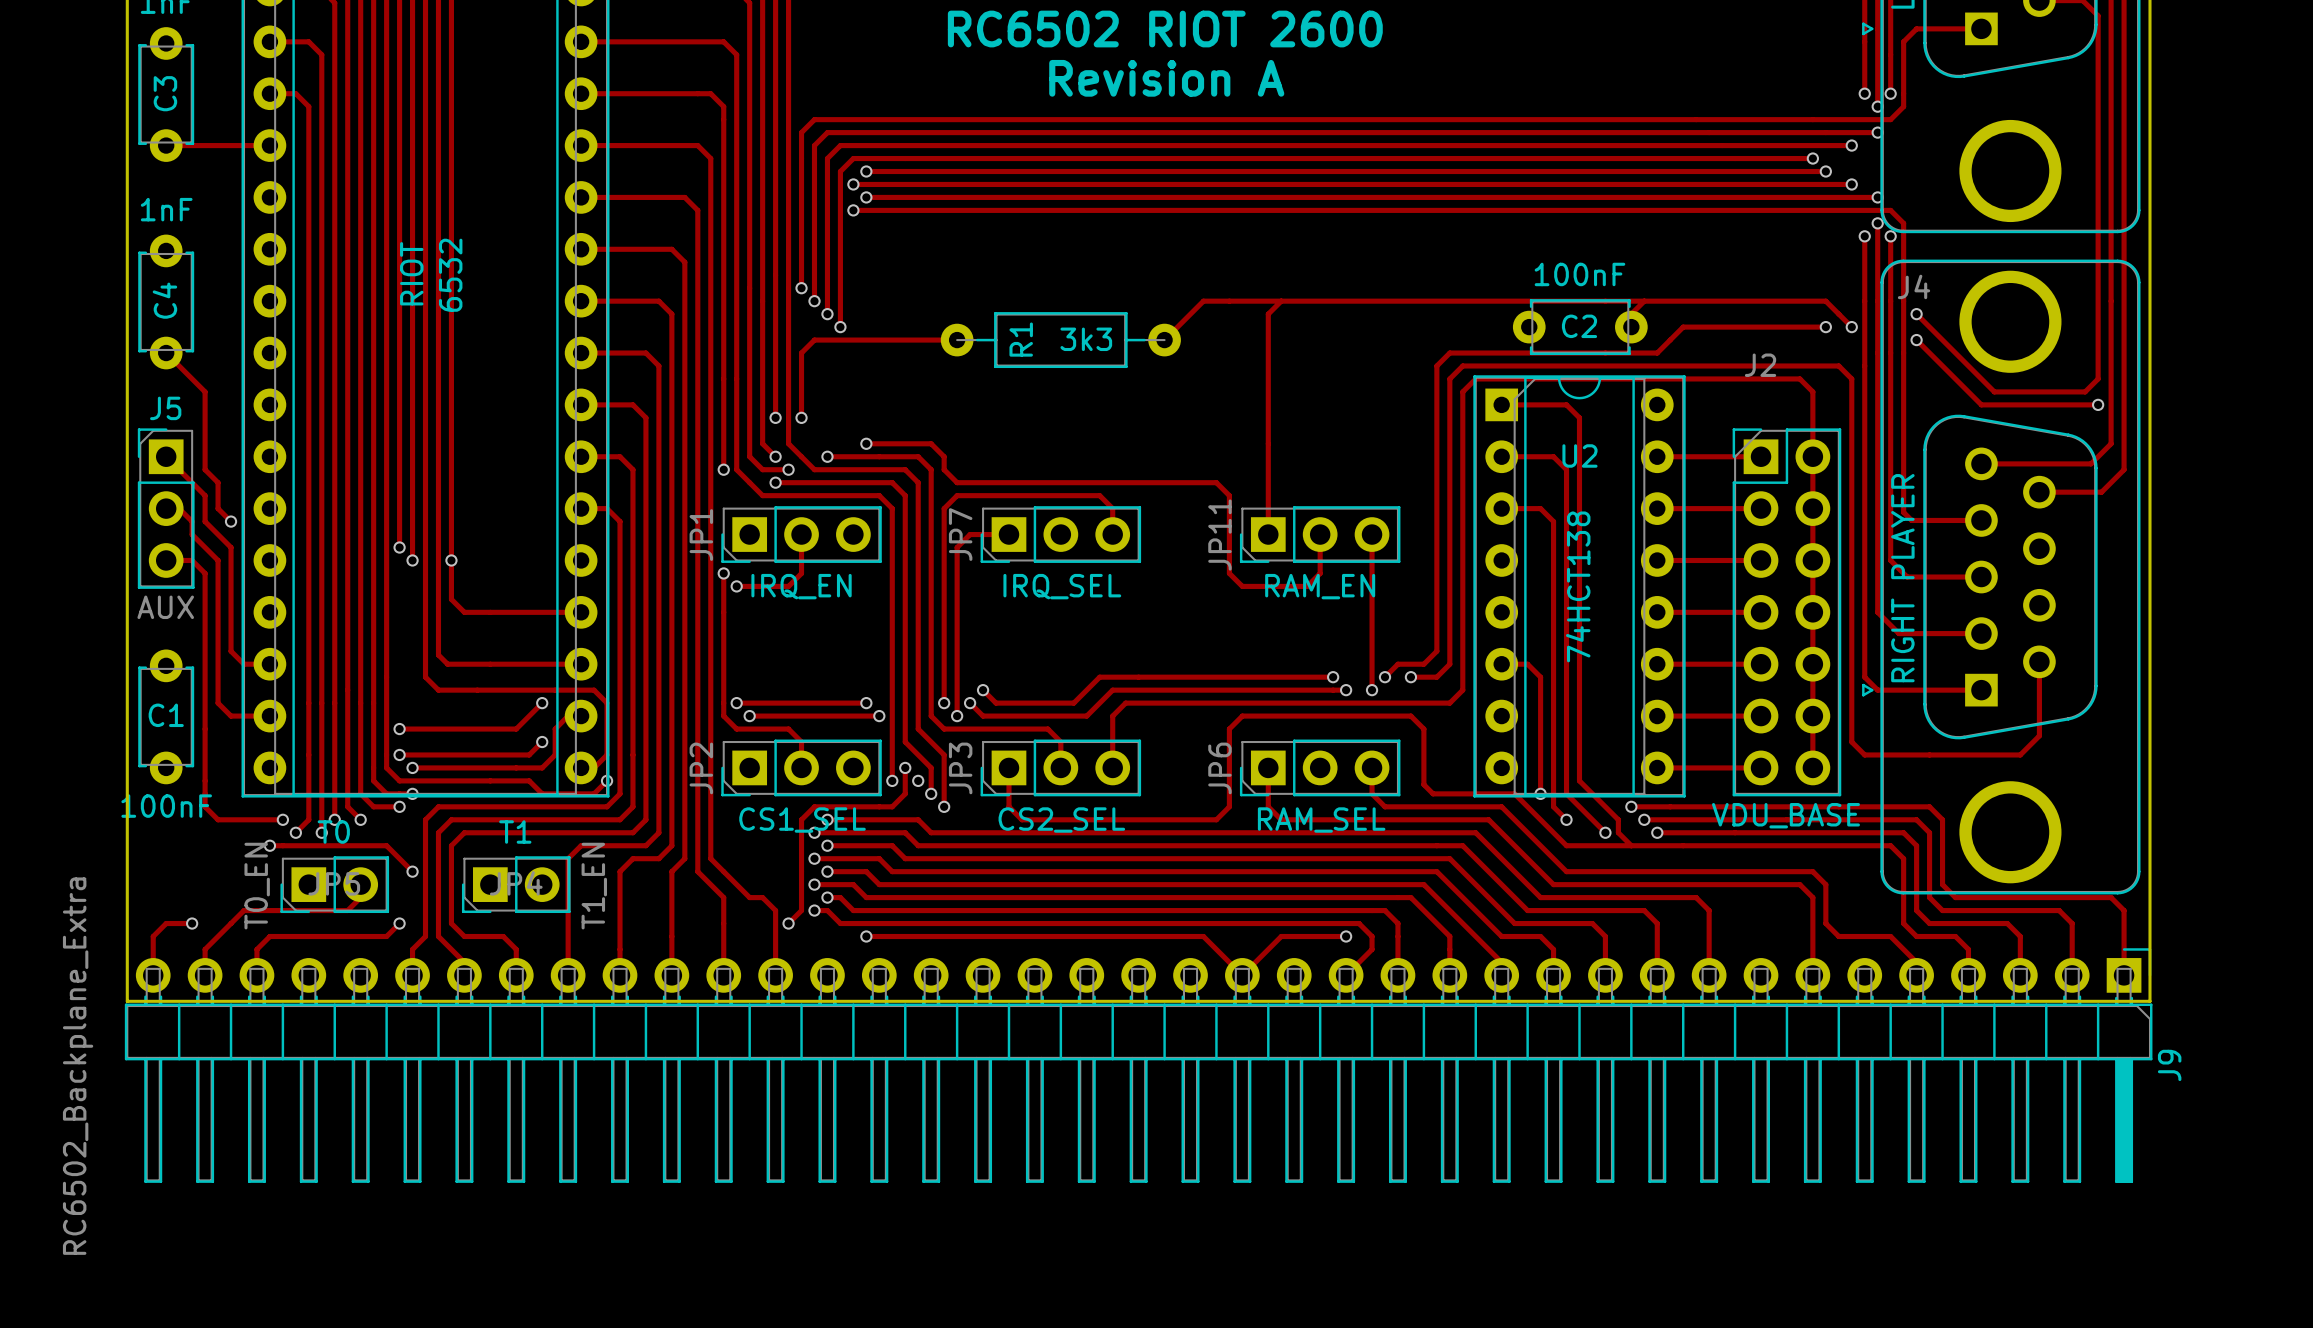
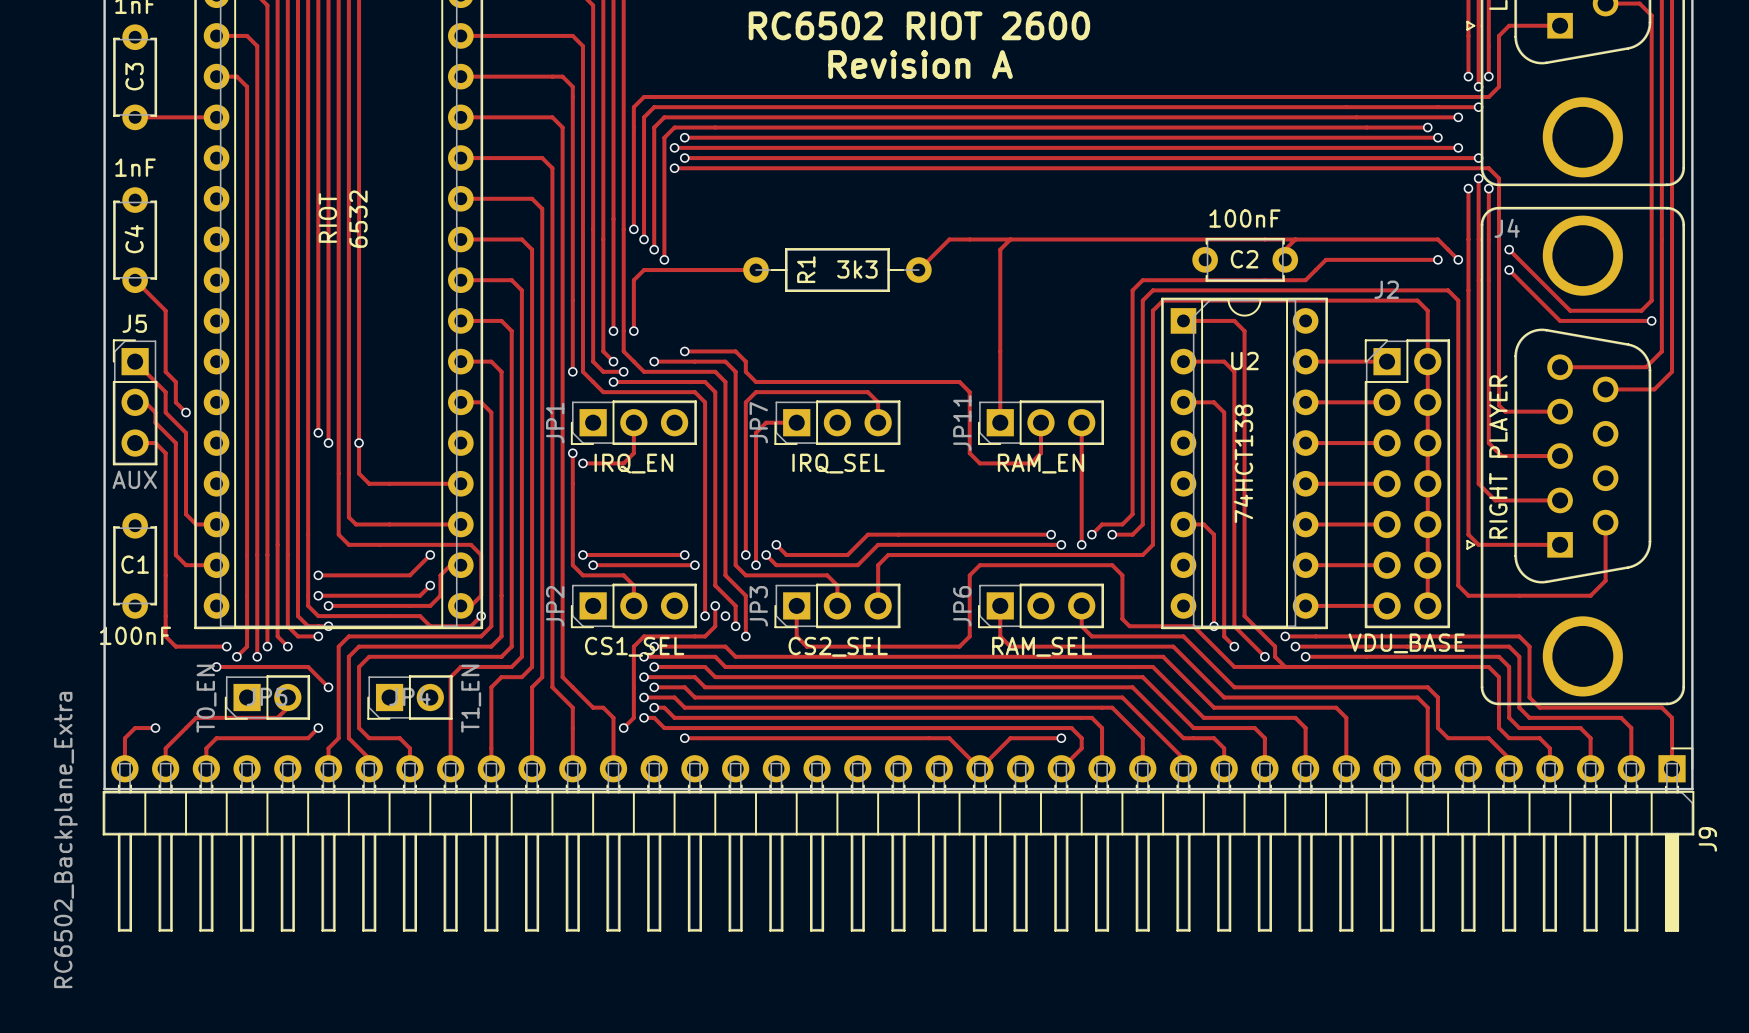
text: T0 (333, 832) -> none
text: T1 (515, 832) -> none

